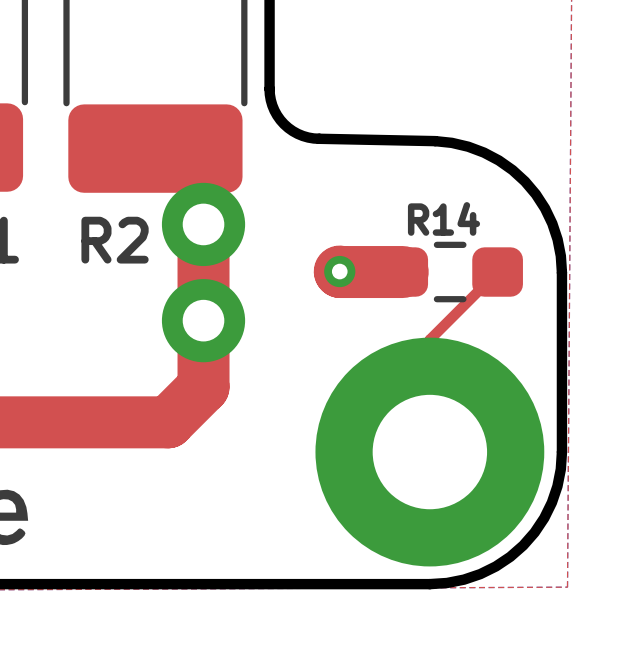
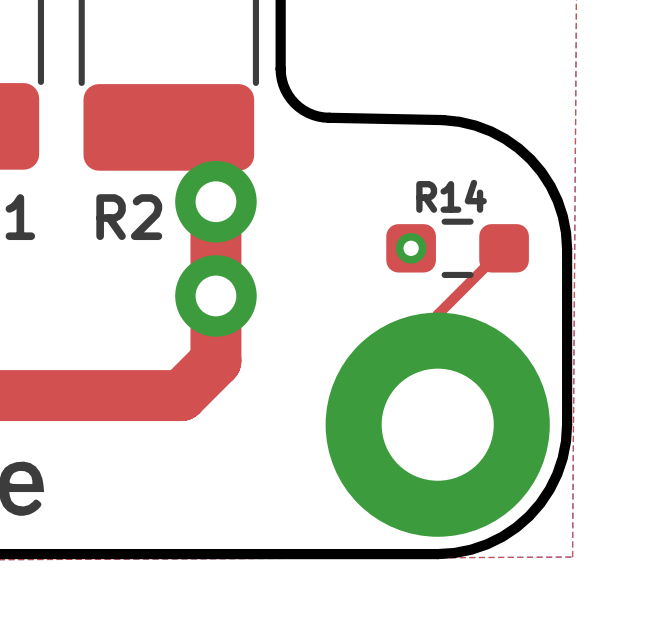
via position: (339, 271) -> (411, 248)
top track: (340, 272) (402, 272) -> none

